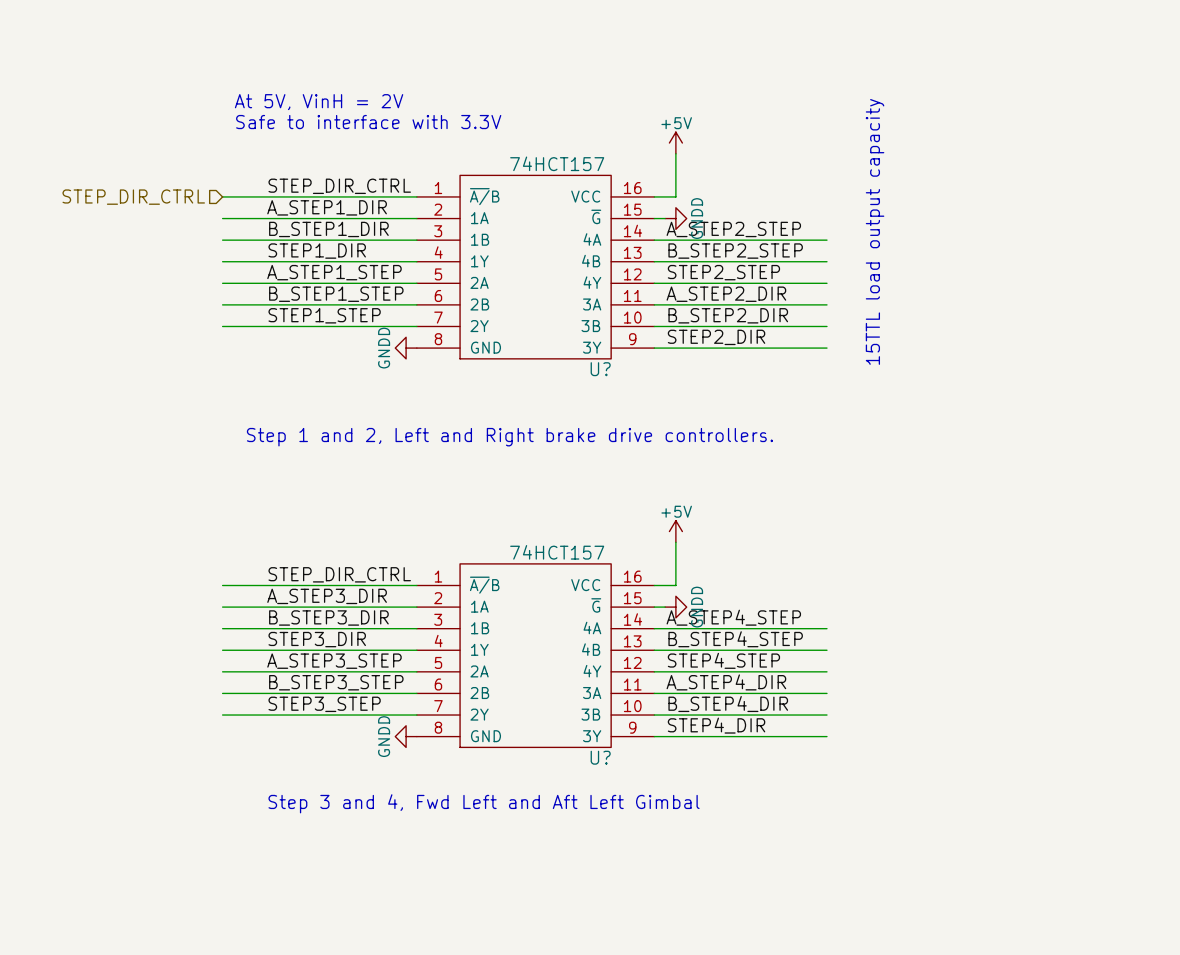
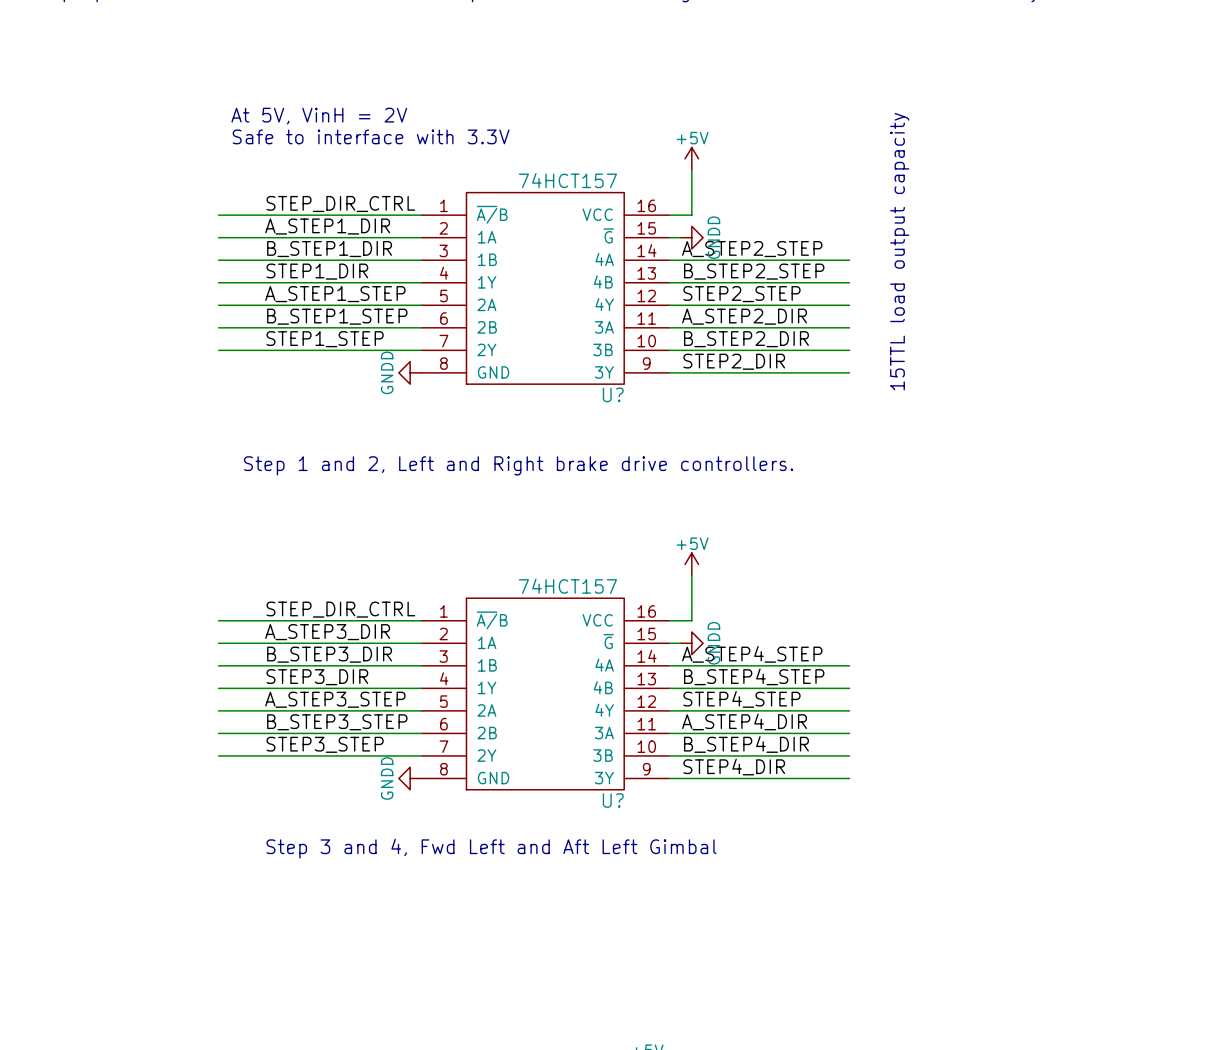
hierarchical label: STEP_DIR_CTRL (133, 197) -> none

